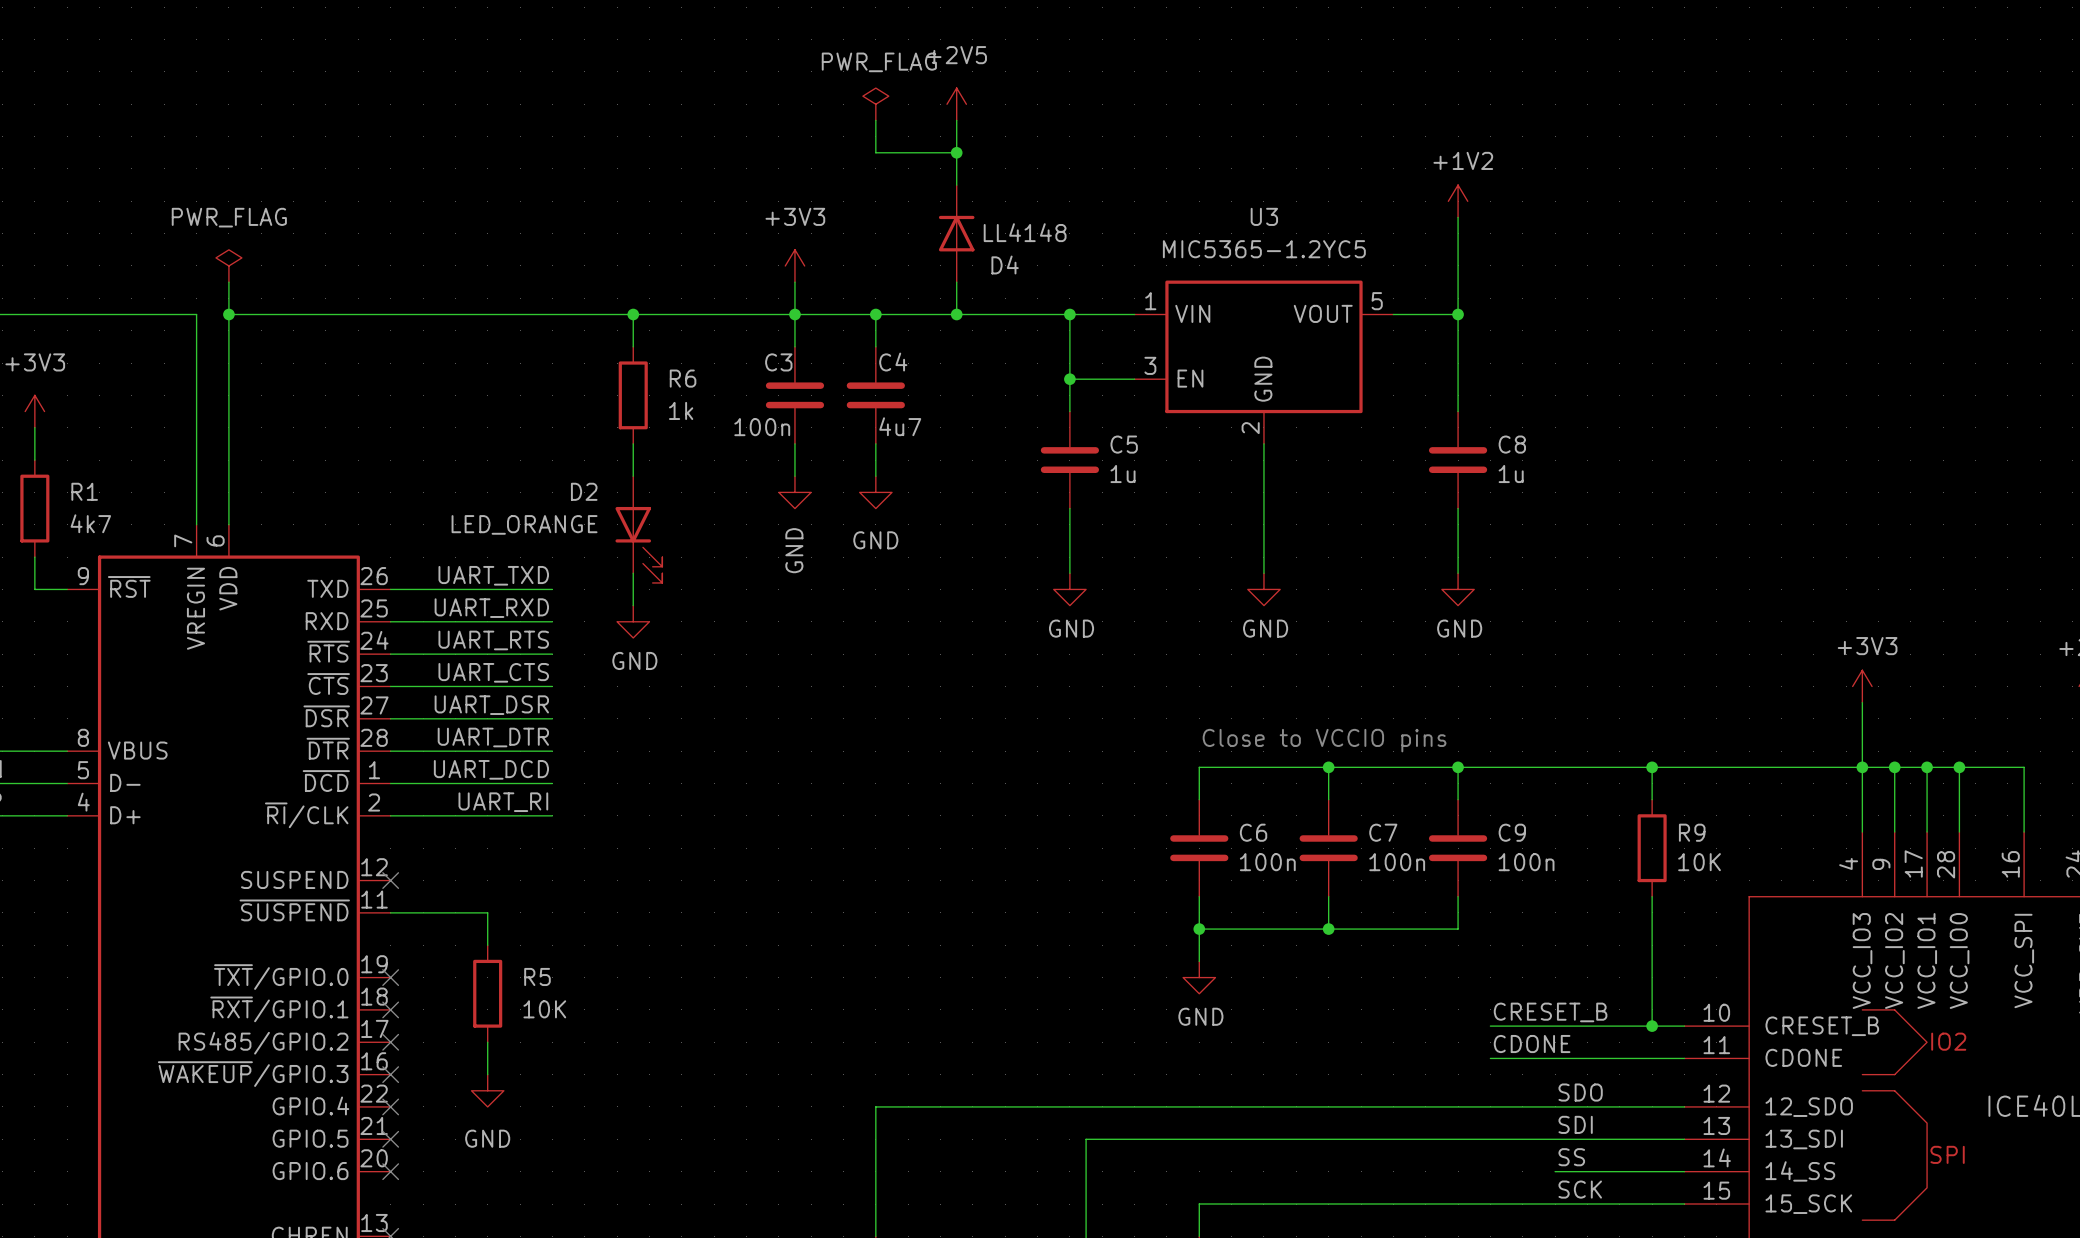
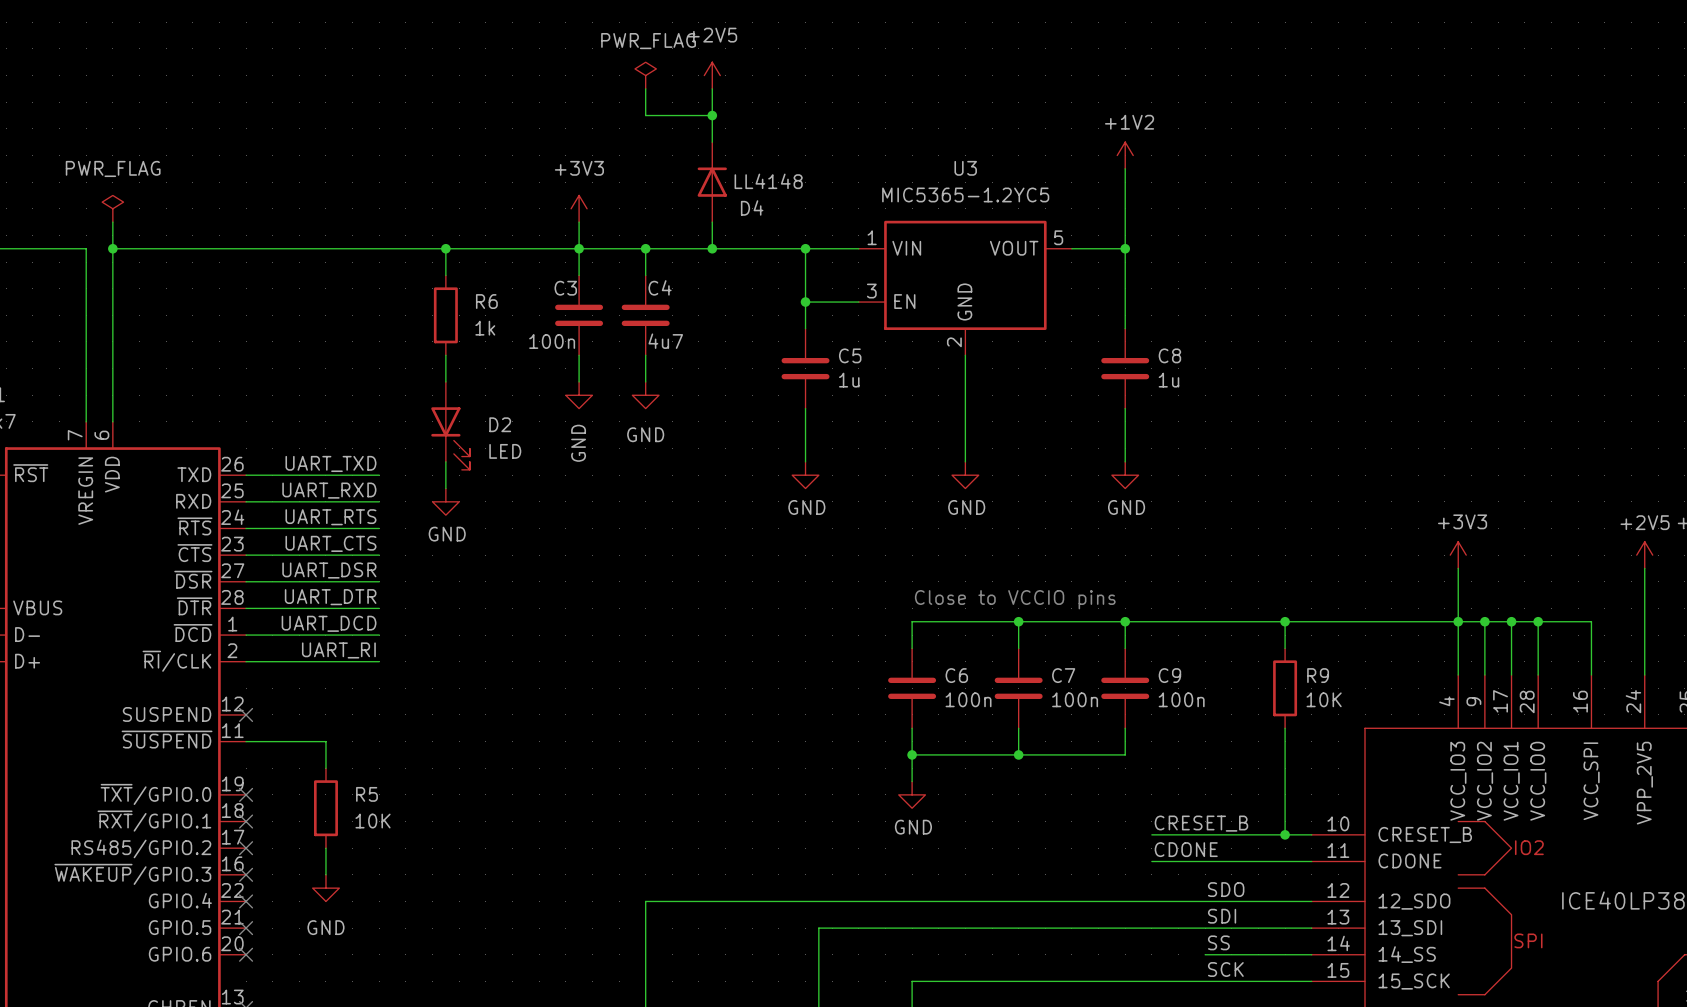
D2 name position: D2 (584, 491) -> D2 (500, 424)
D2 value: LED_ORANGE (524, 524) -> LED (505, 451)

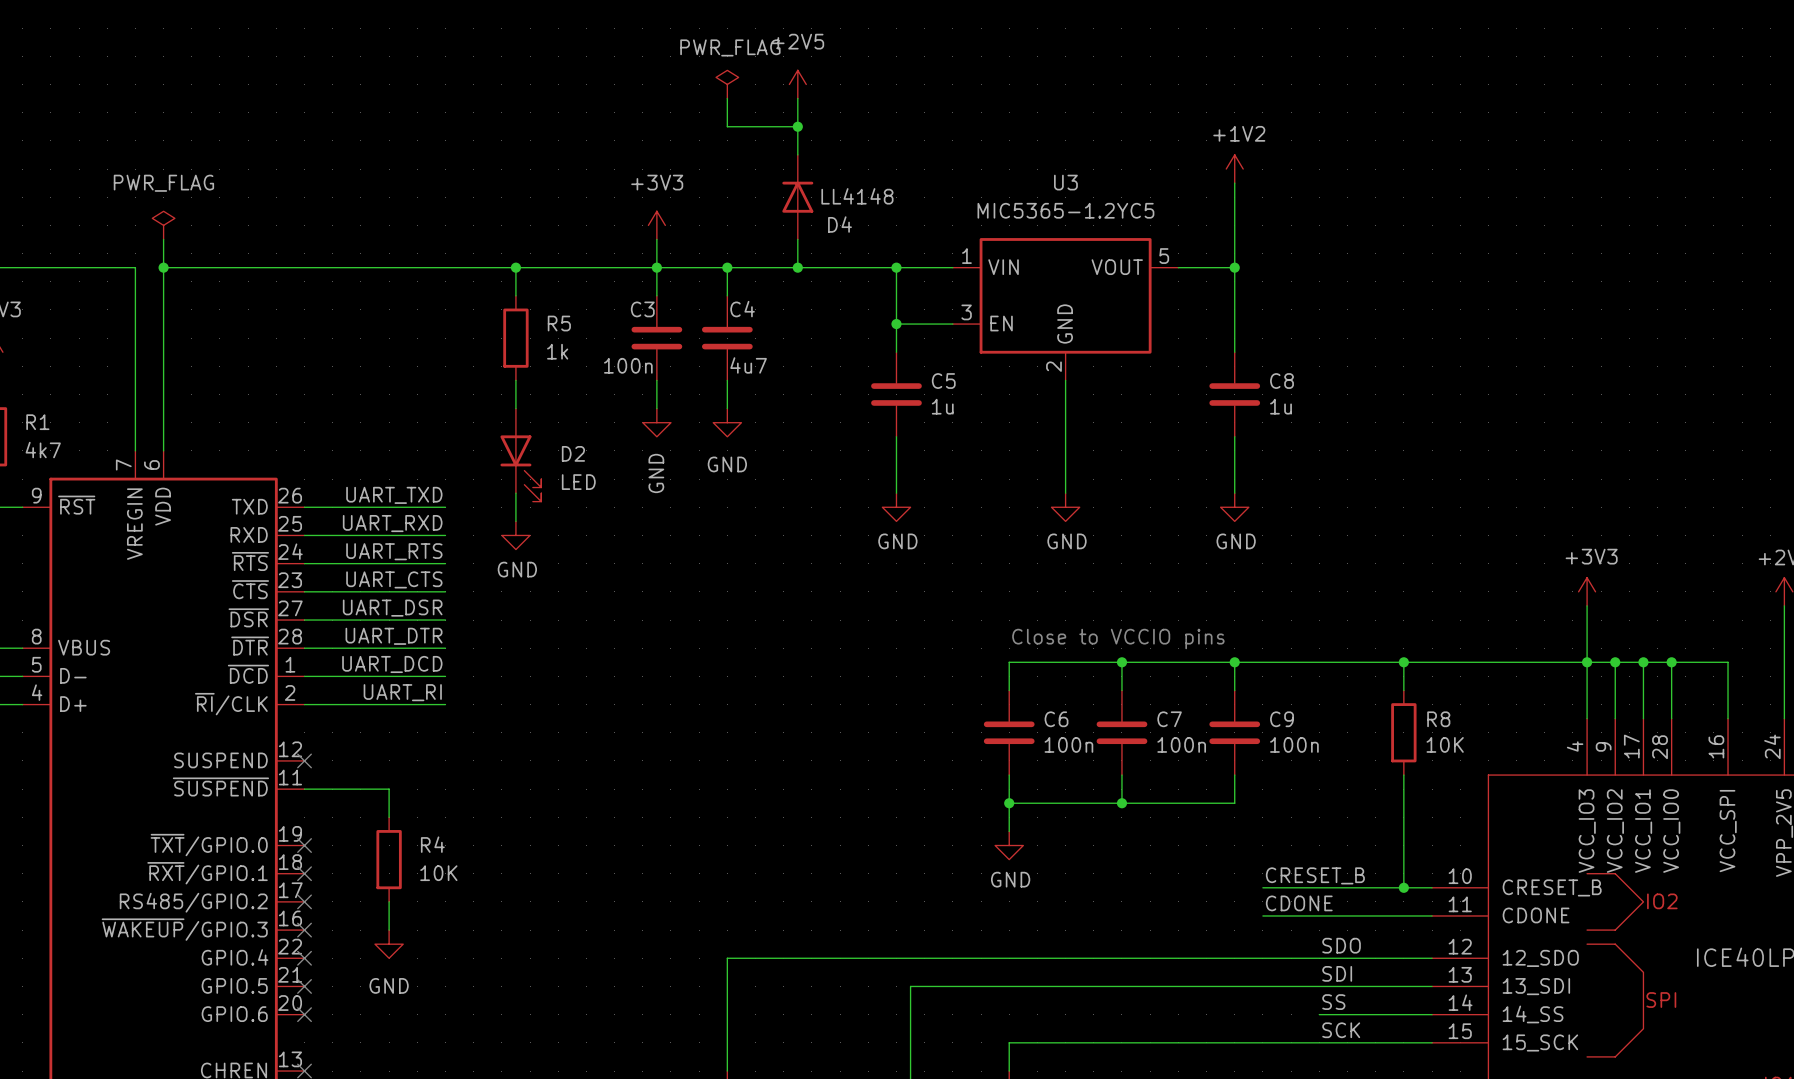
R6 name: R6 (486, 301) -> R5 (559, 323)
R9 name: R9 (1318, 675) -> R8 (1438, 719)
R5 name: R5 (366, 794) -> R4 (432, 844)

